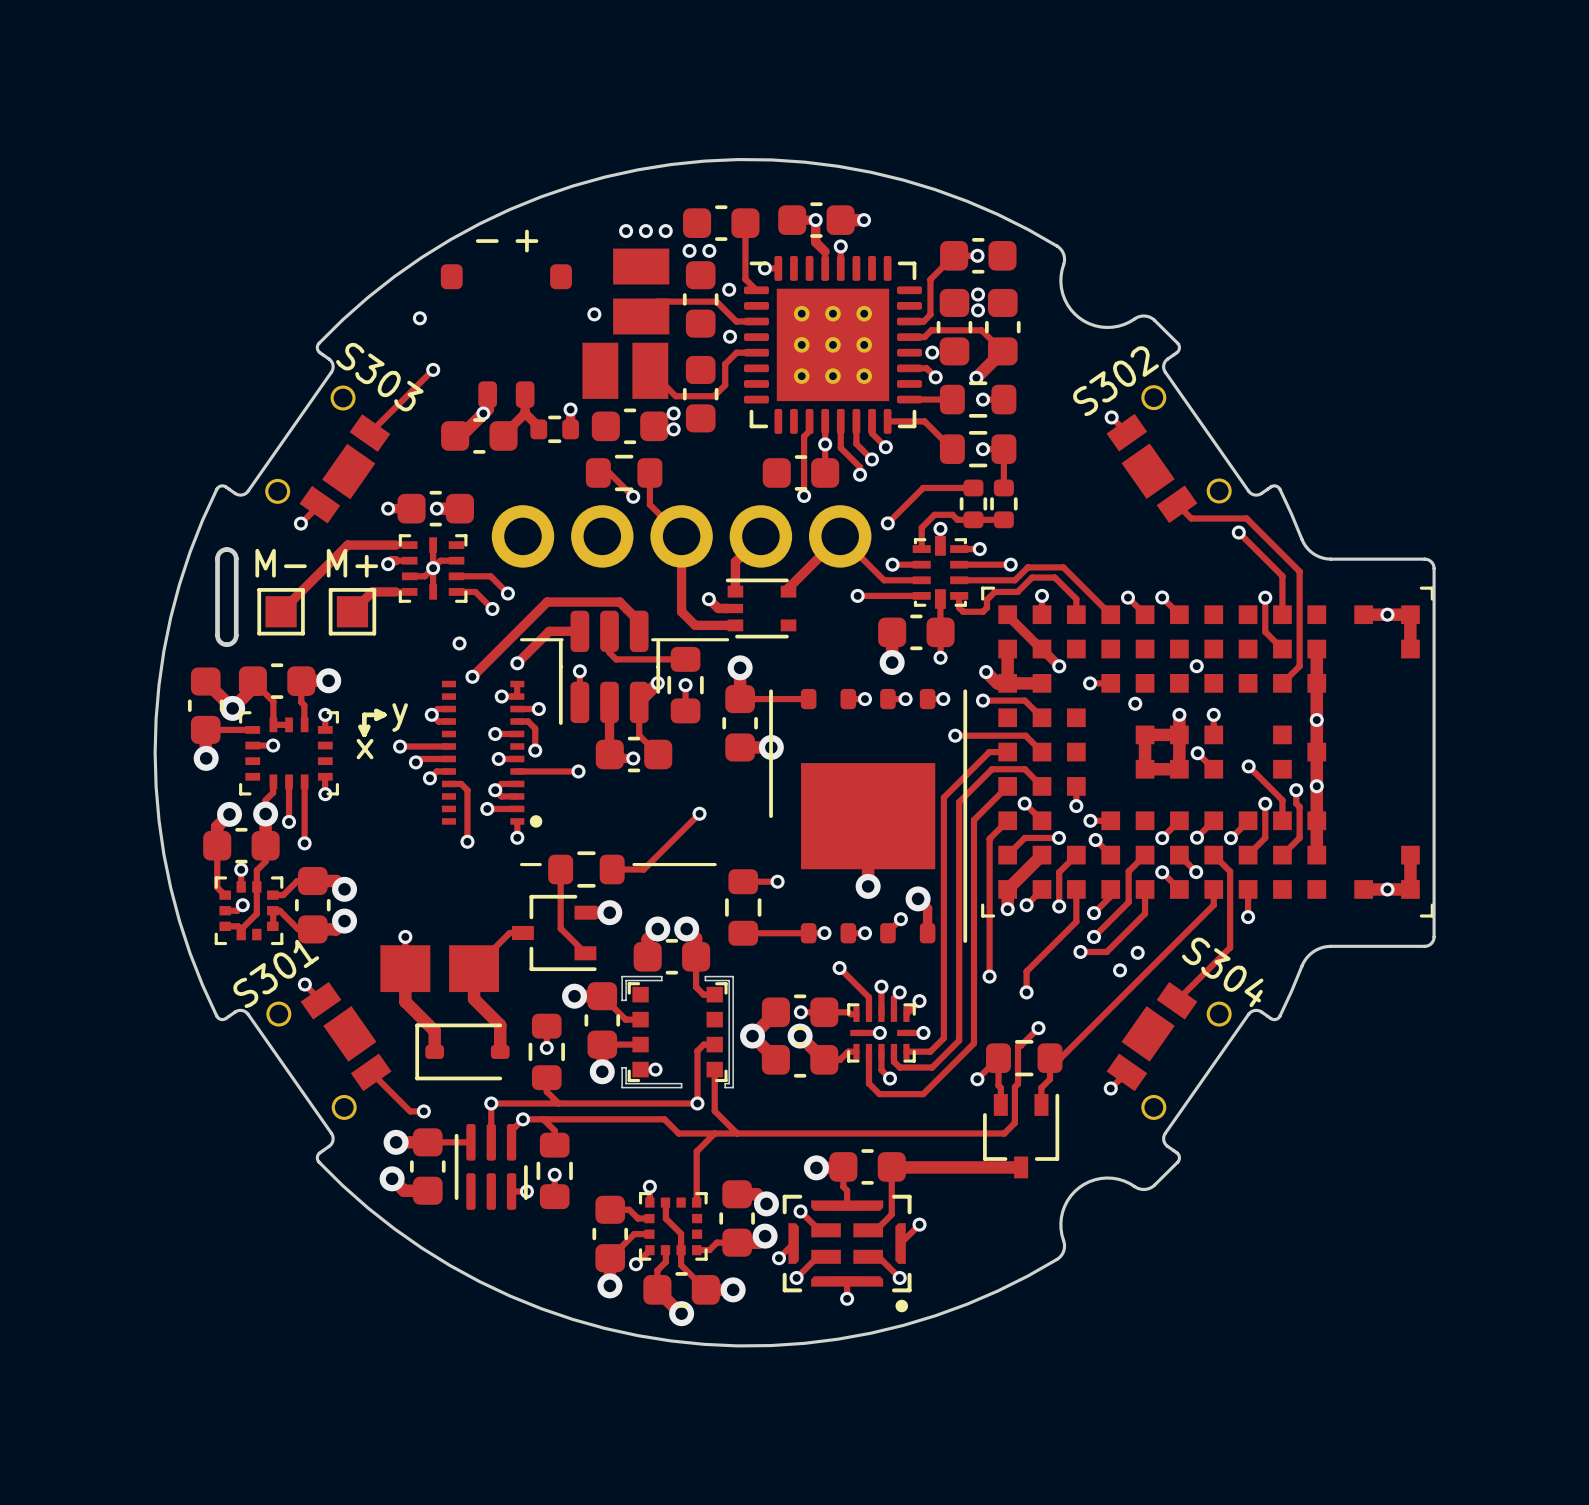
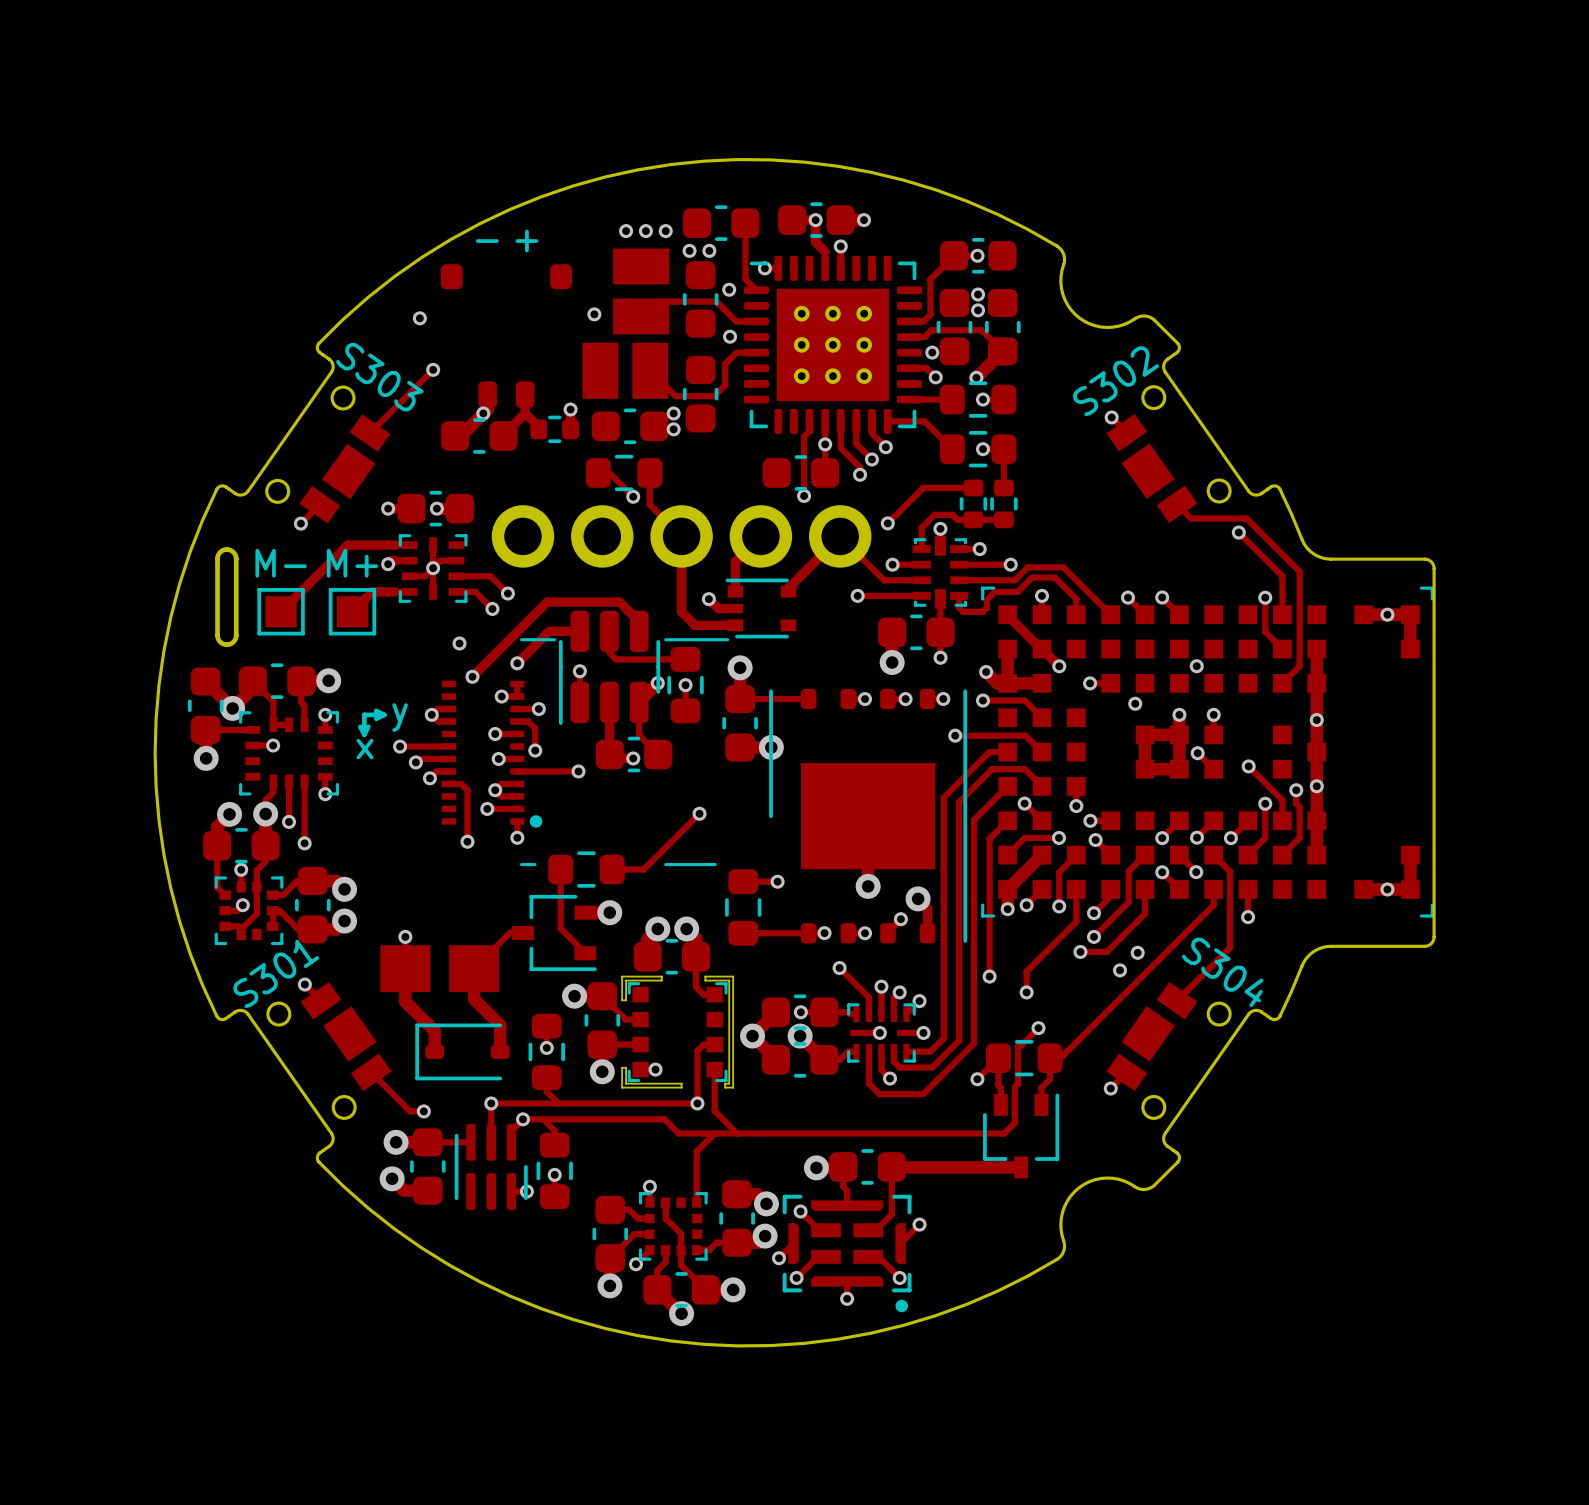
line: (554, 639) (562, 639) -> none
line: (652, 639) (665, 639) -> none
line: (534, 864) (540, 864) -> none
line: (633, 864) (665, 864) -> none

